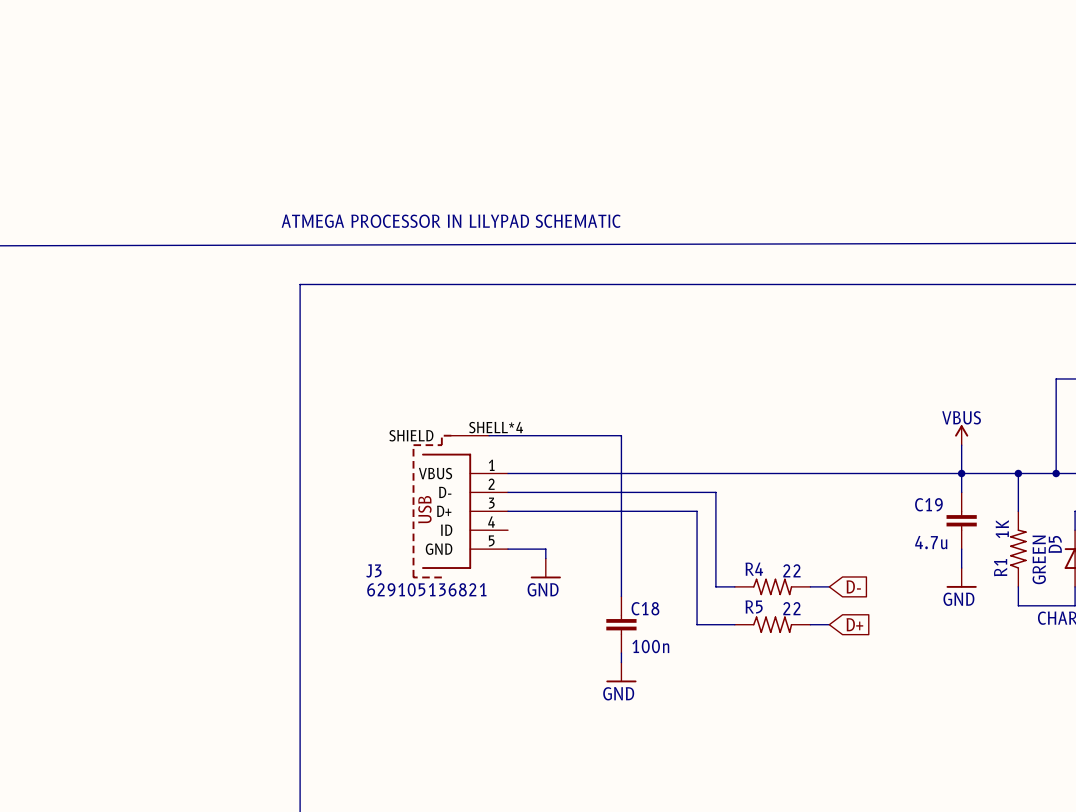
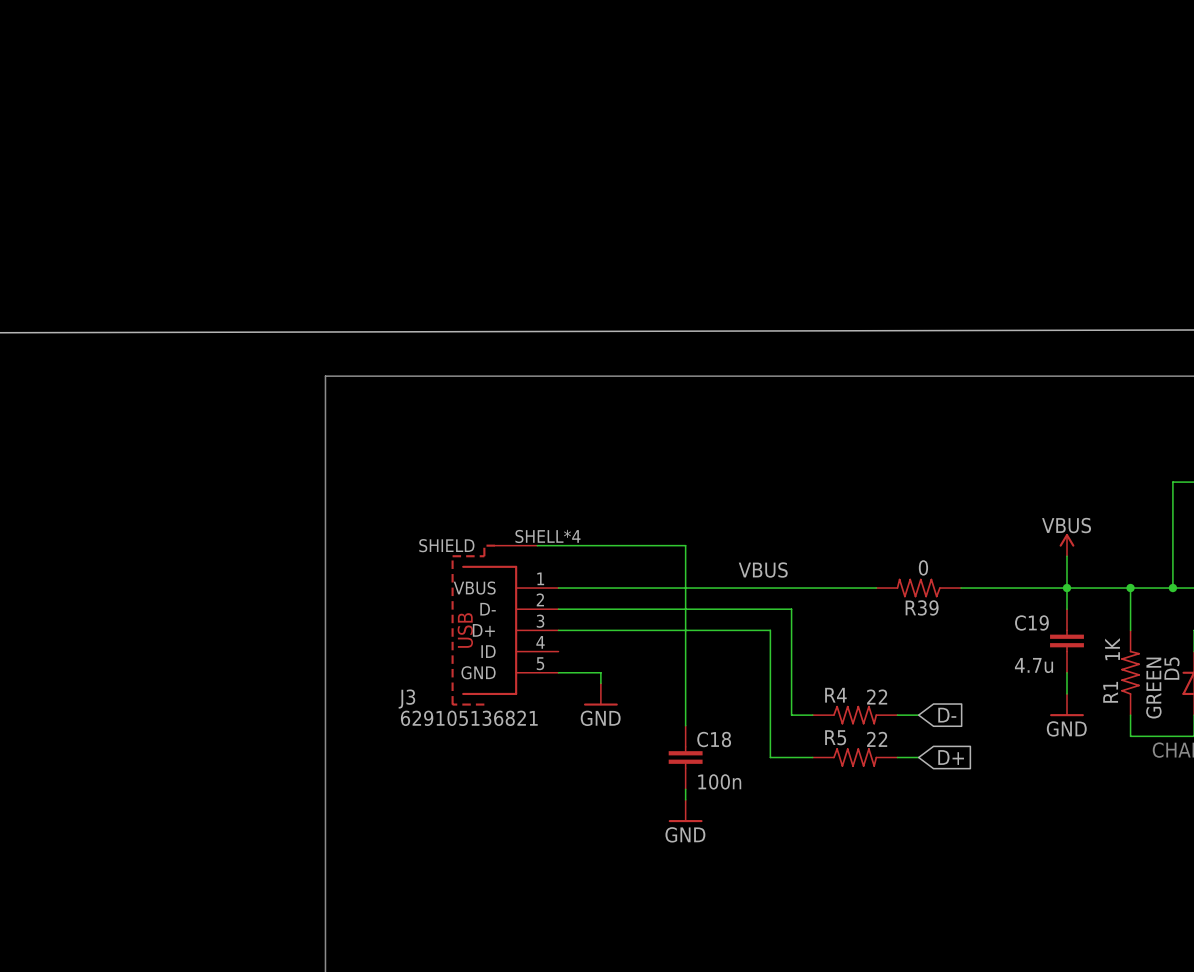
text: ATMEGA PROCESSOR IN LILYPAD SCHEMATIC (451, 221) -> none
label: none -> VBUS (763, 570)
R39: none -> 0 (918, 588)

